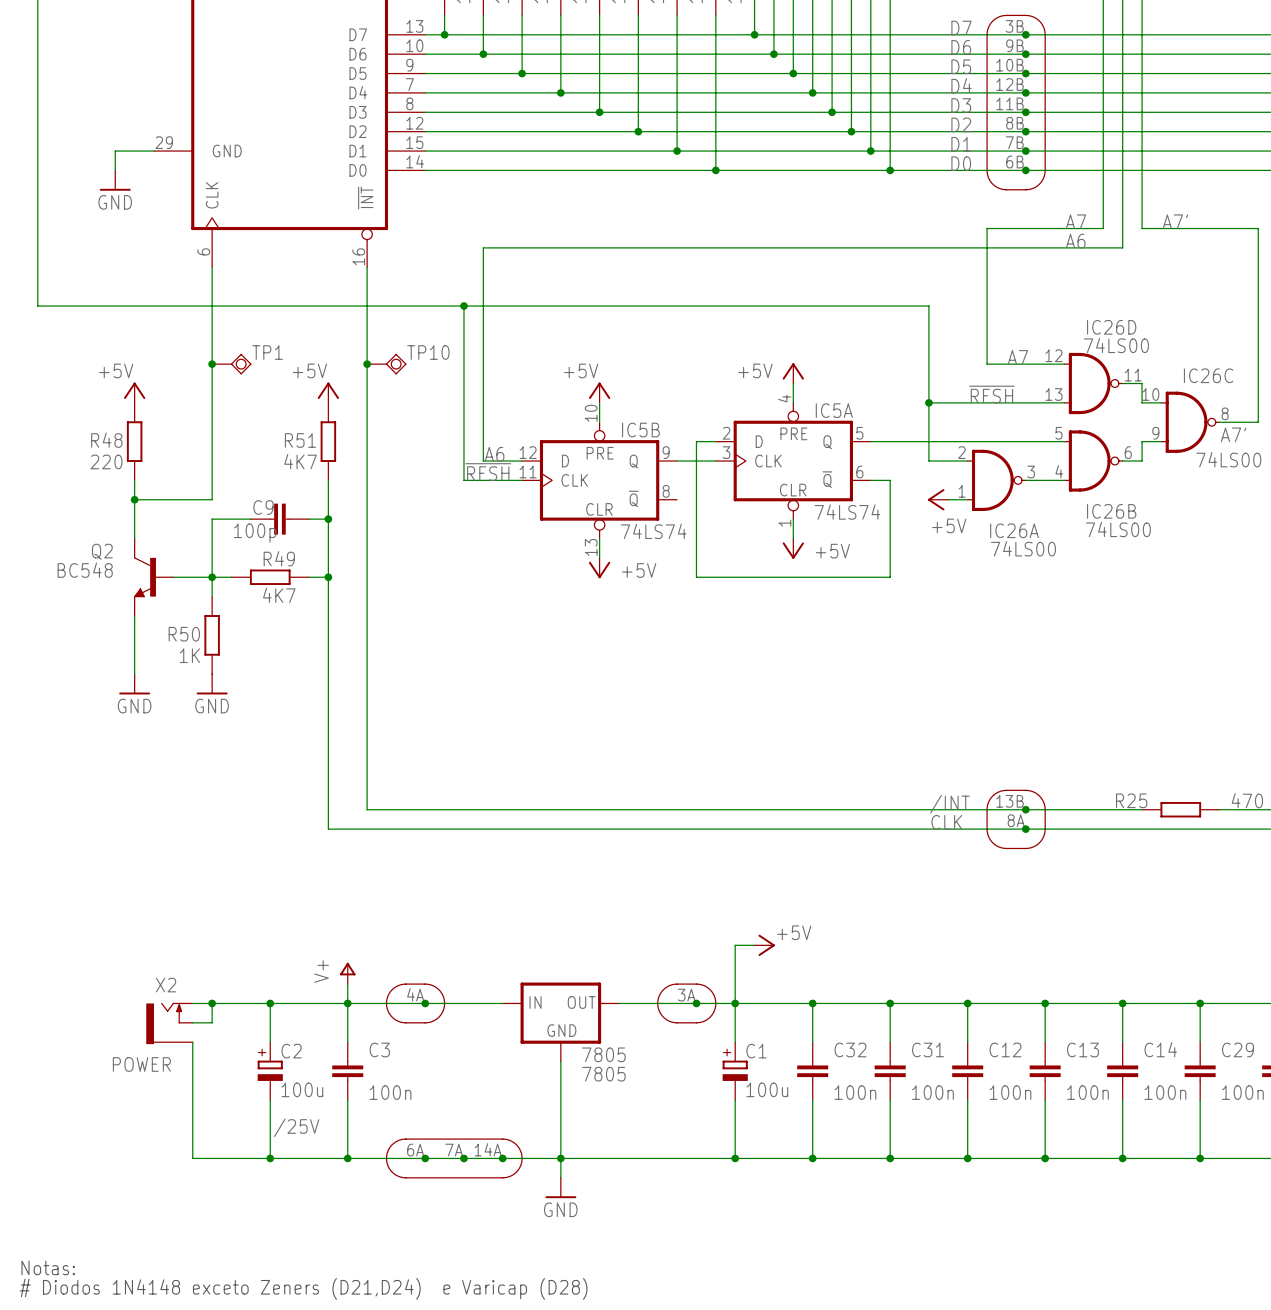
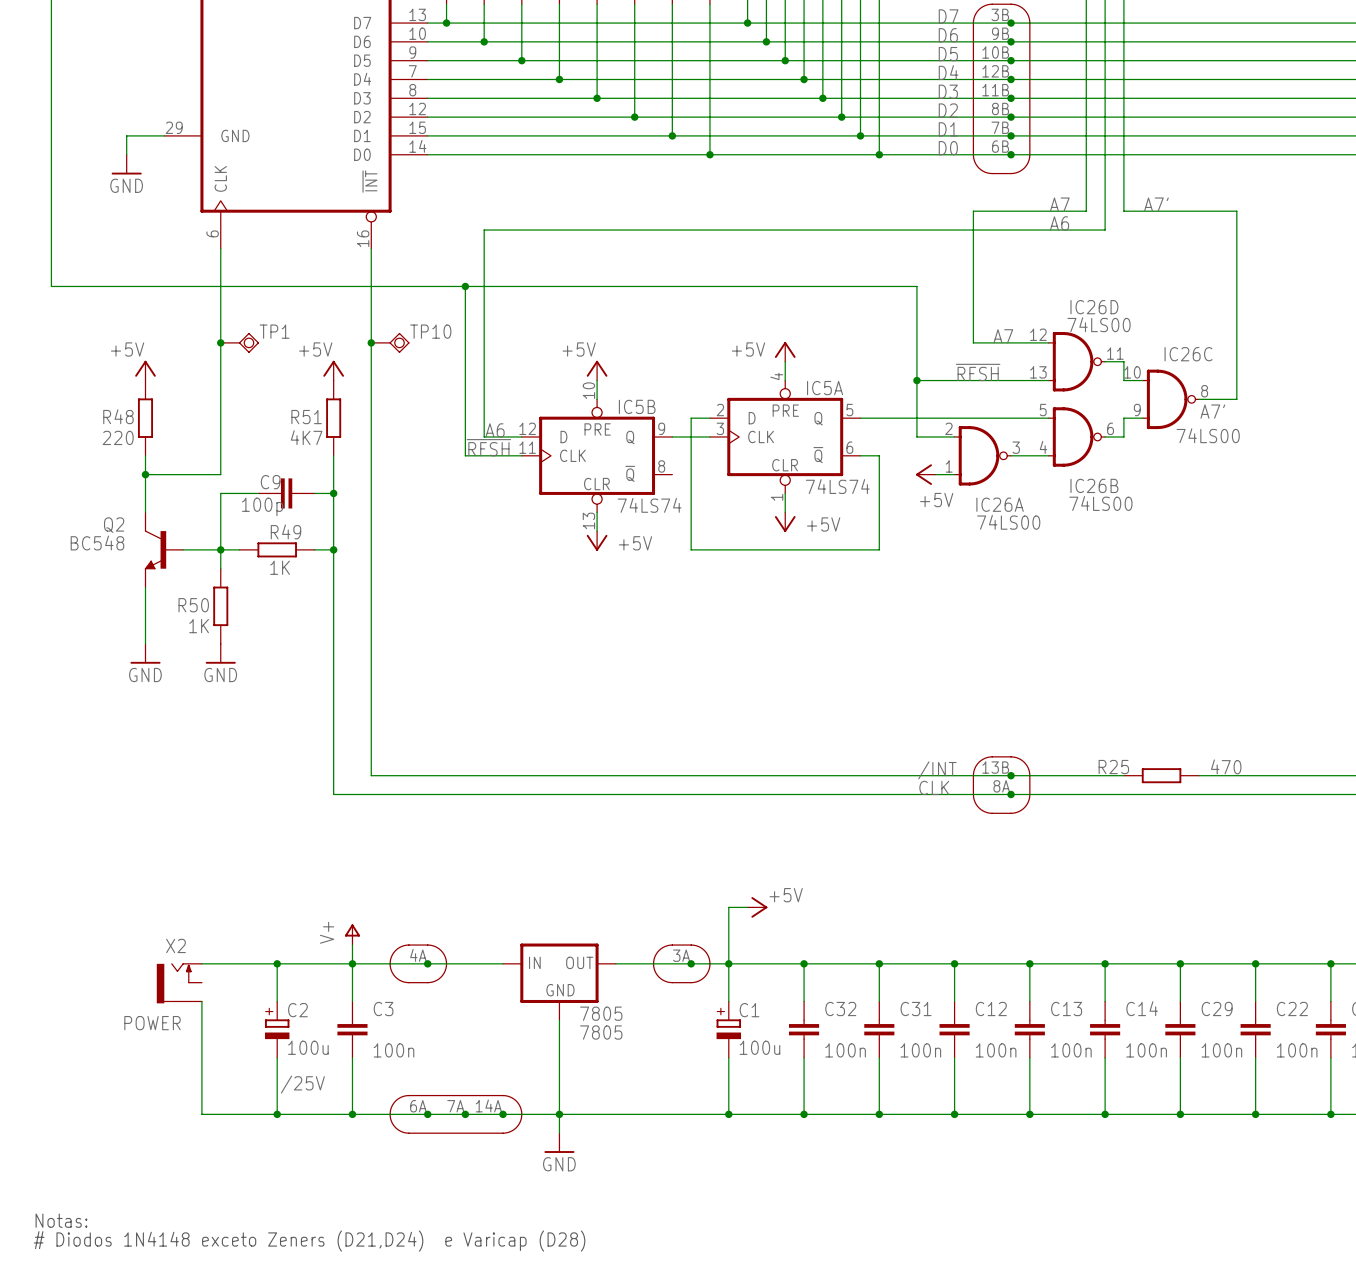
R49 value: 4K7 (279, 595) -> 1K (280, 567)
wire: (212, 1003) (212, 1022) (192, 1022) -> none
junction: (212, 1003) -> none

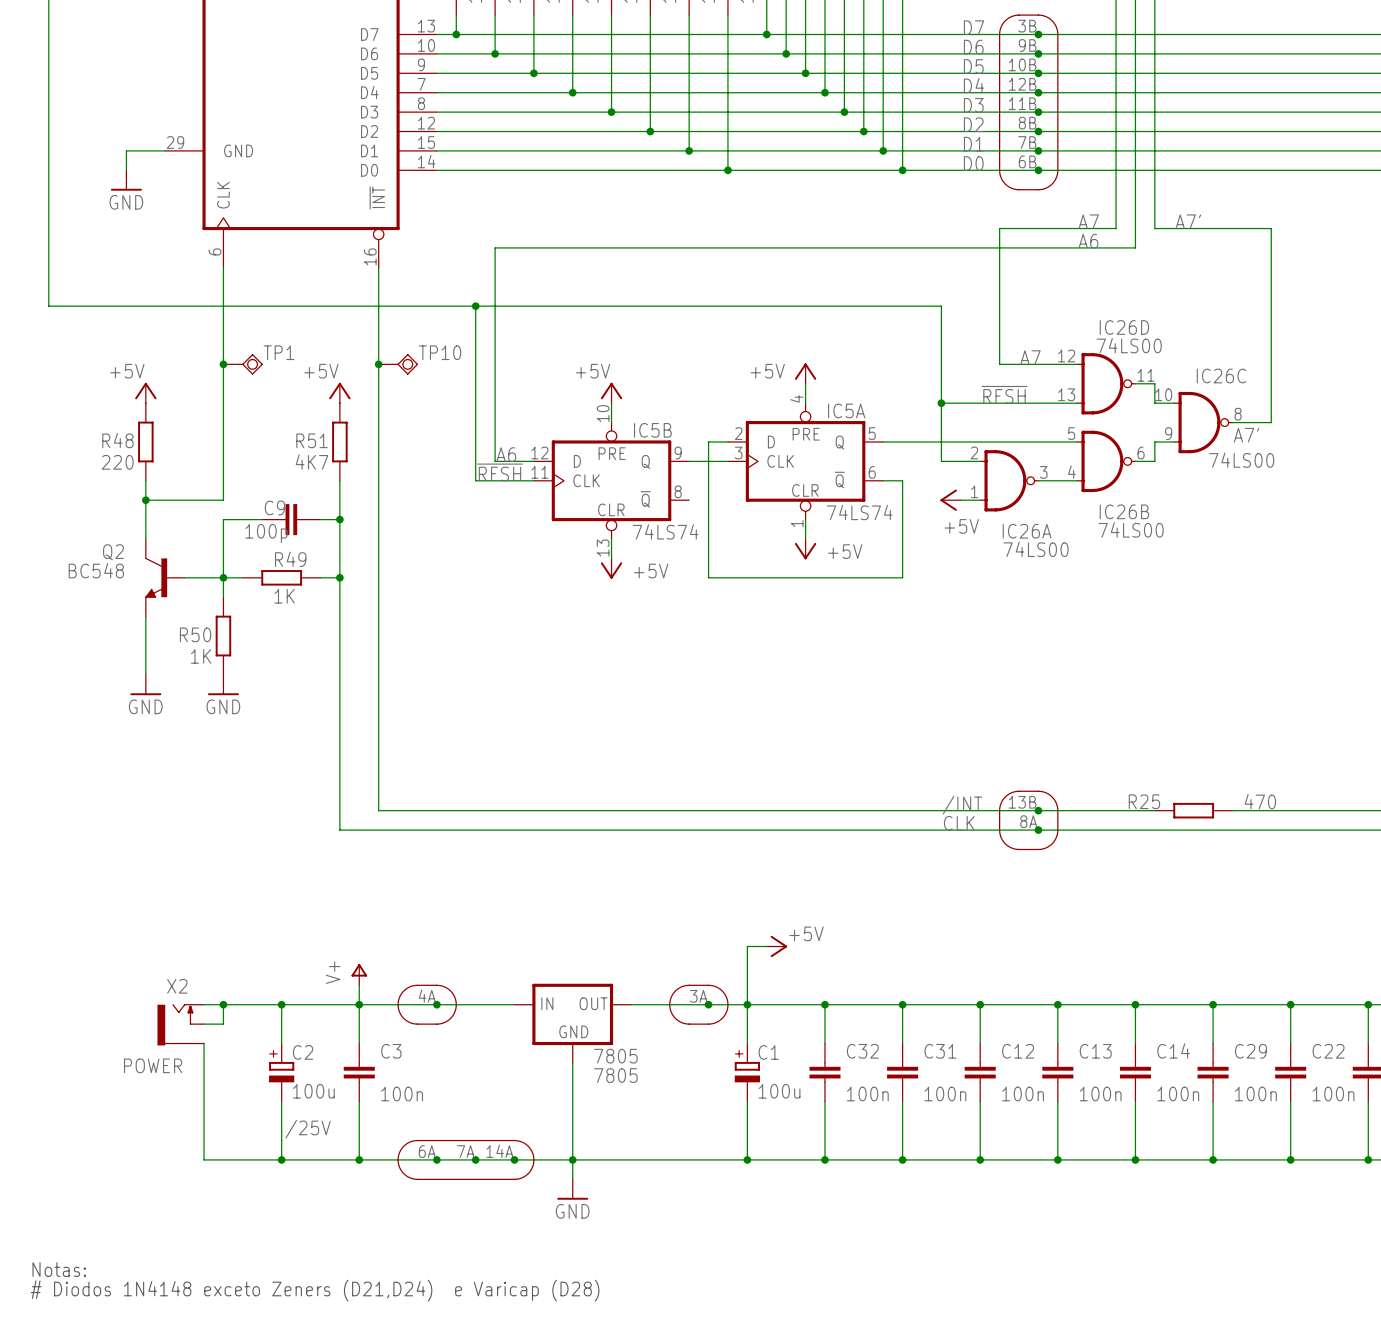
wire: none -> (223, 1004) (223, 1024) (204, 1024)
junction: none -> (223, 1004)

